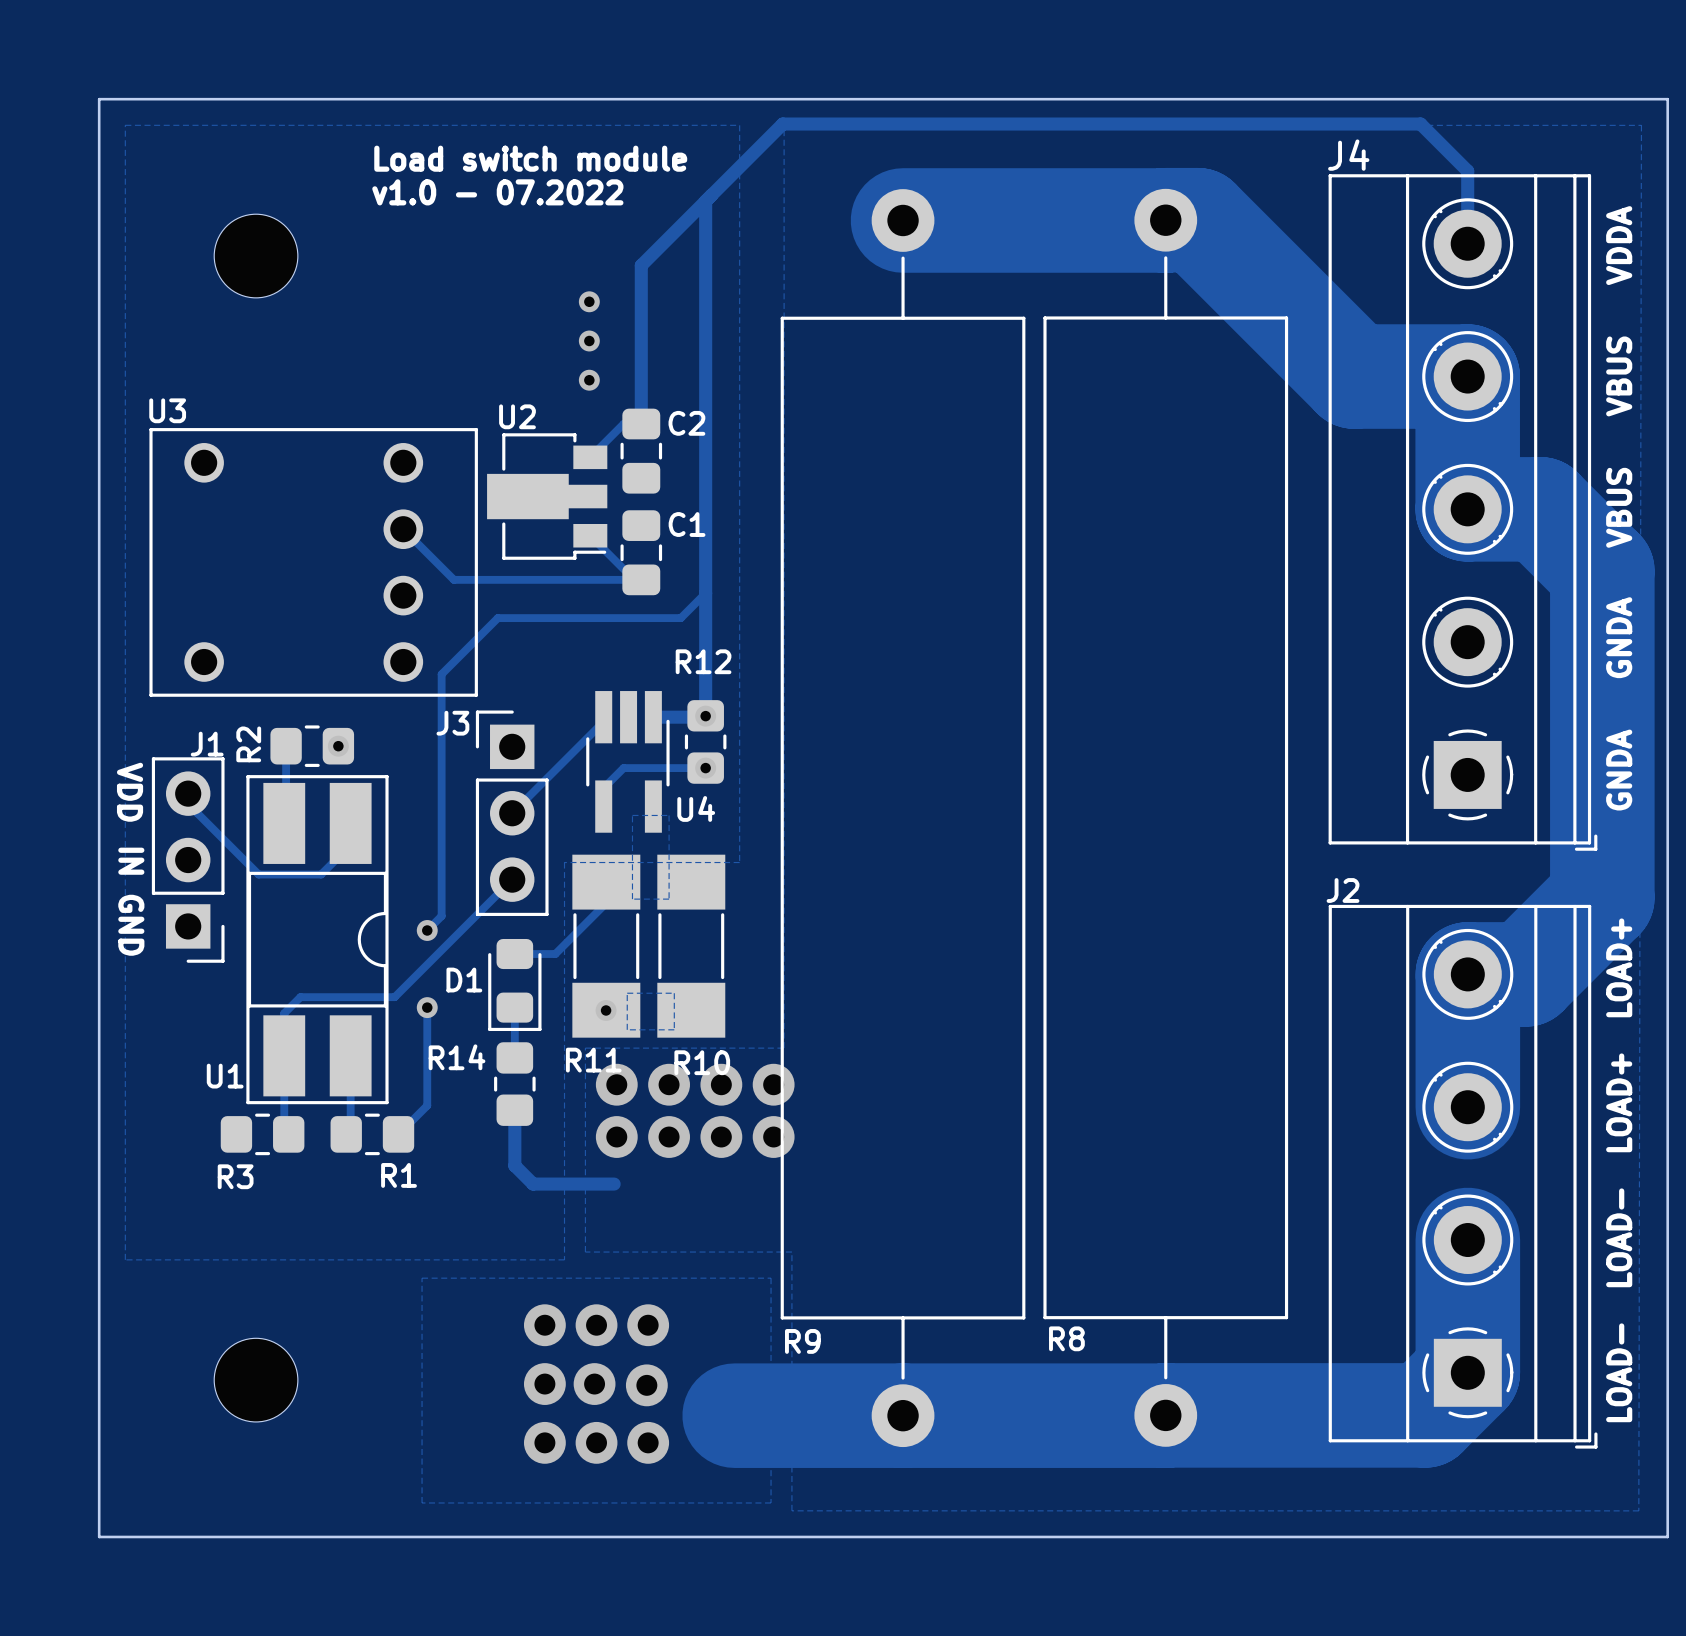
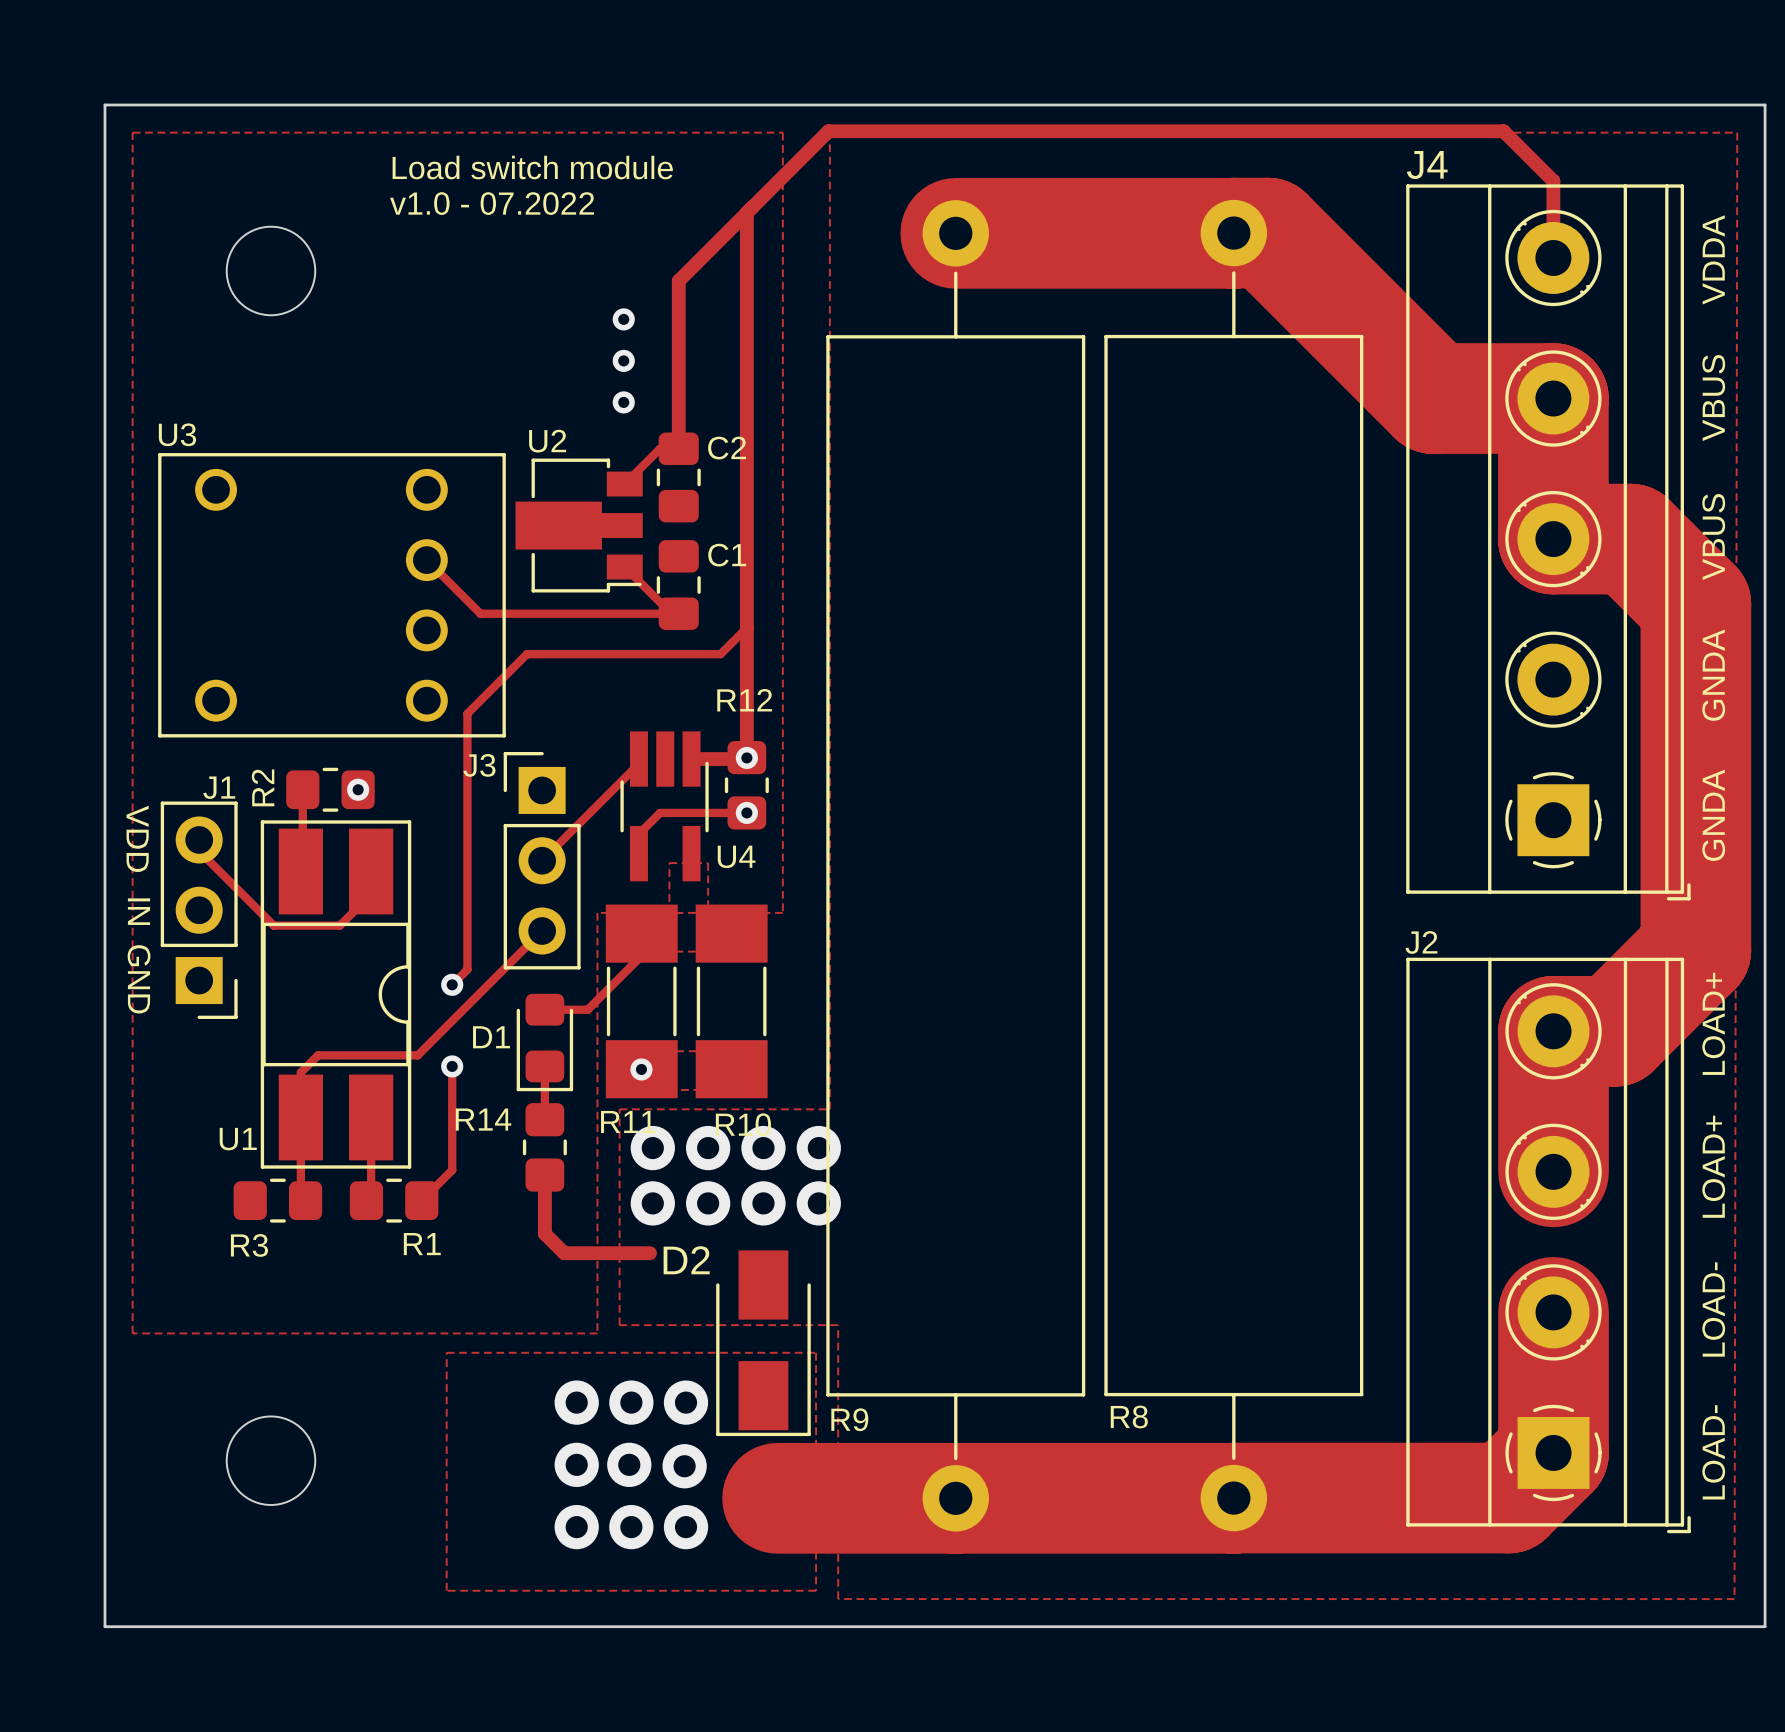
D2: none -> (763, 1343)

